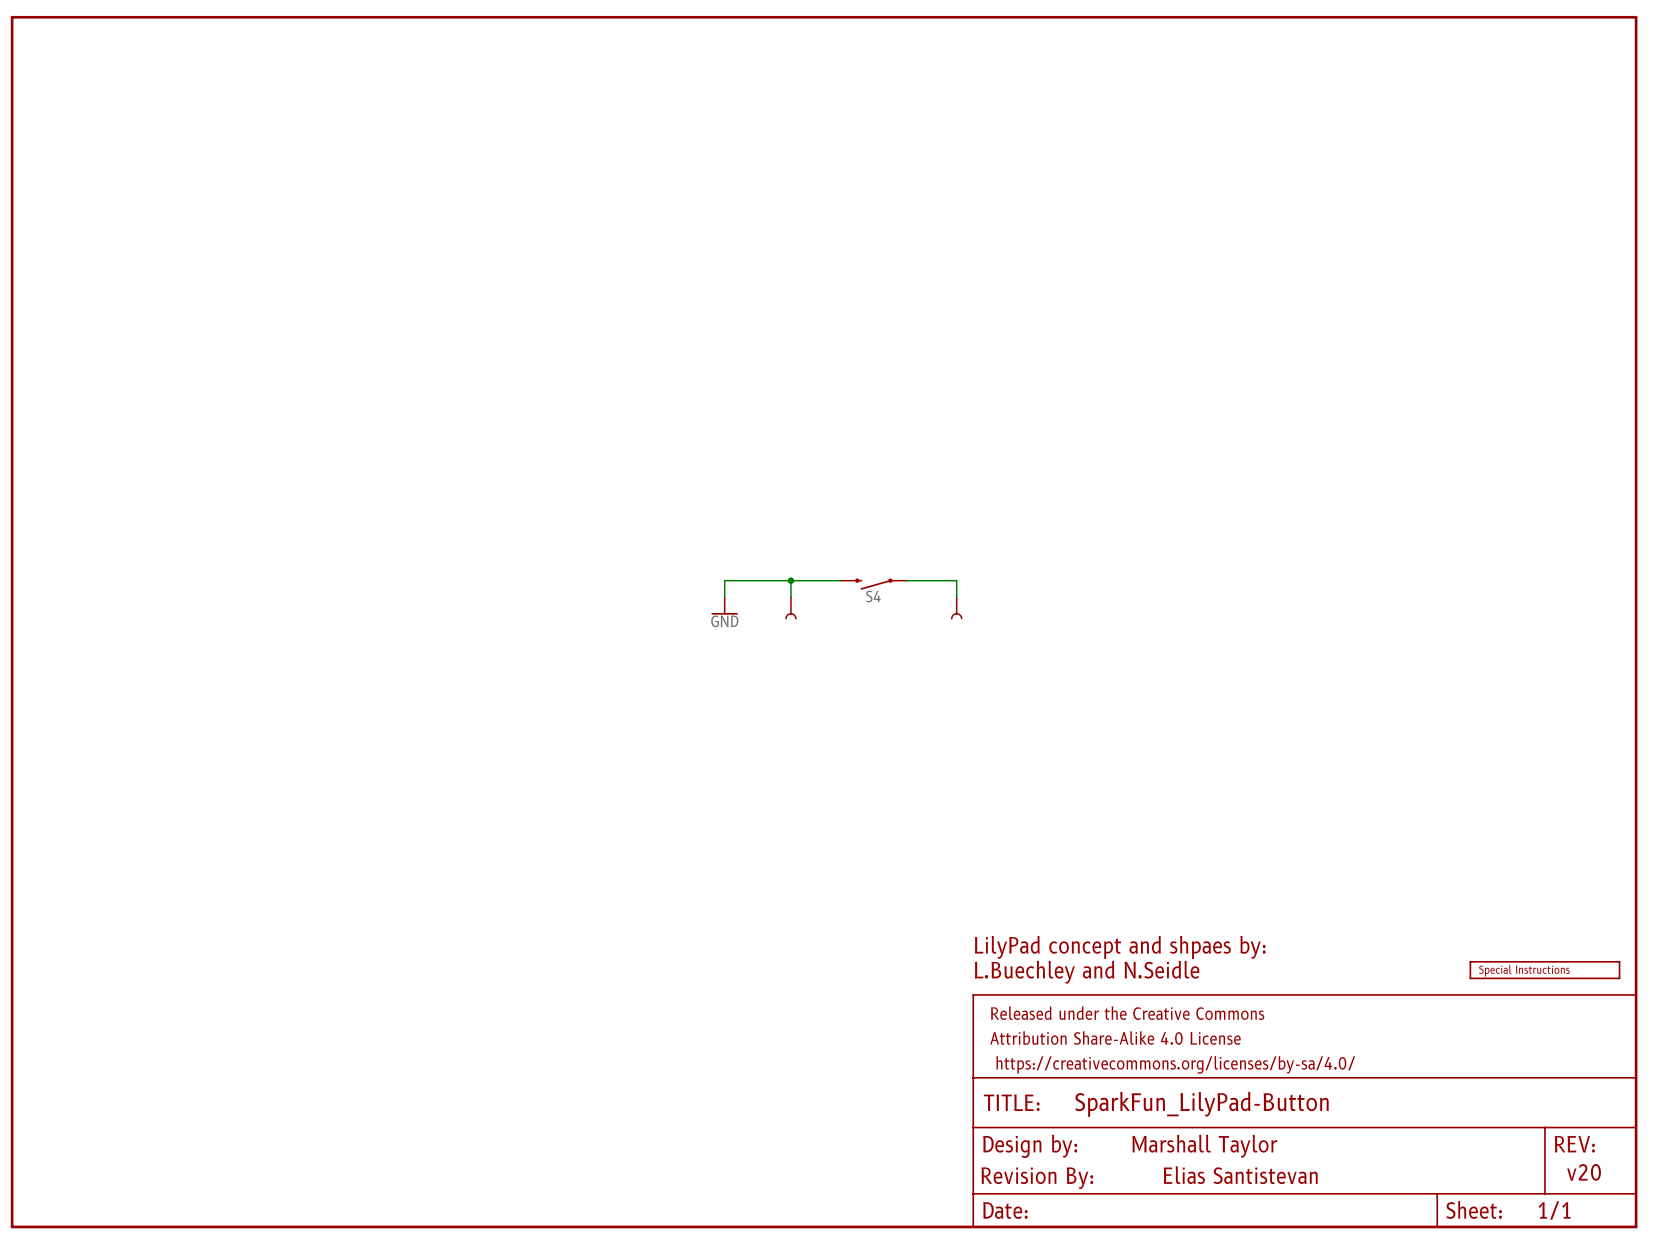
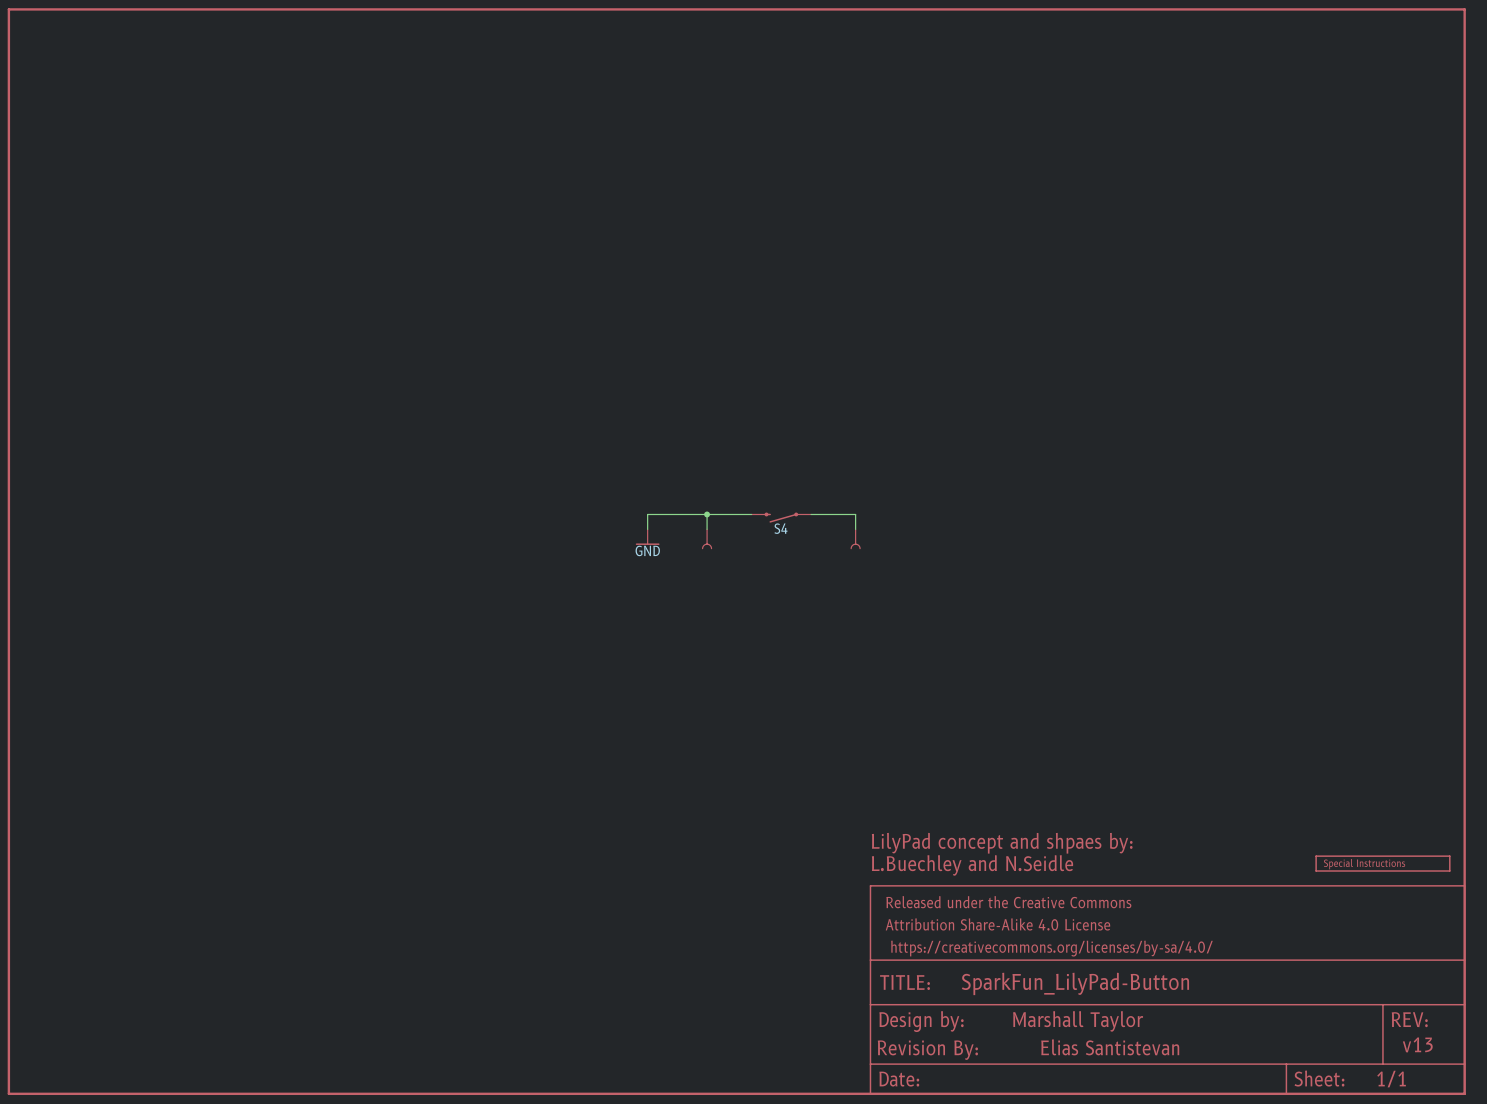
text: v20 (1584, 1172) -> v13 (1417, 1044)

